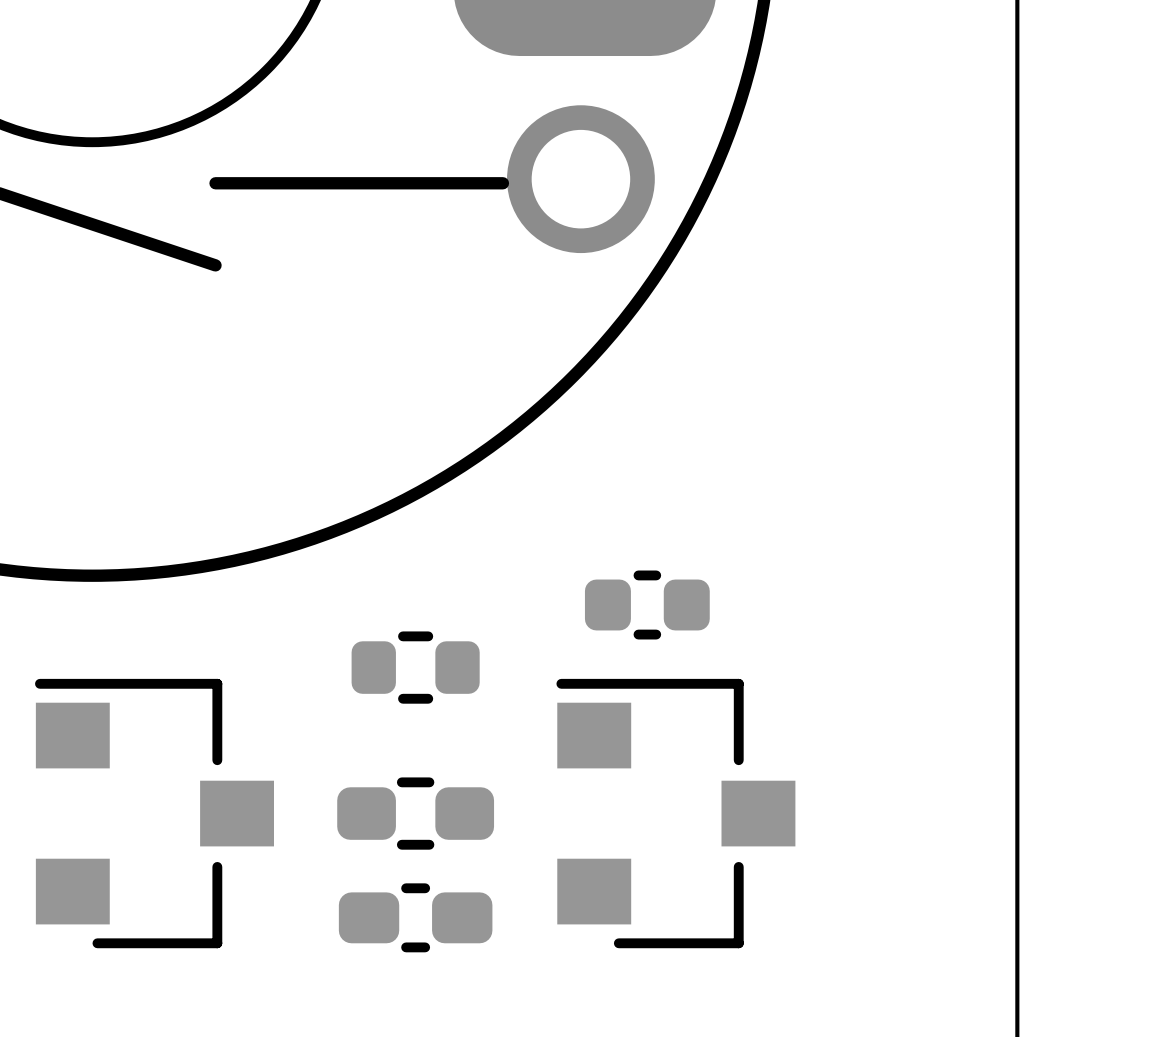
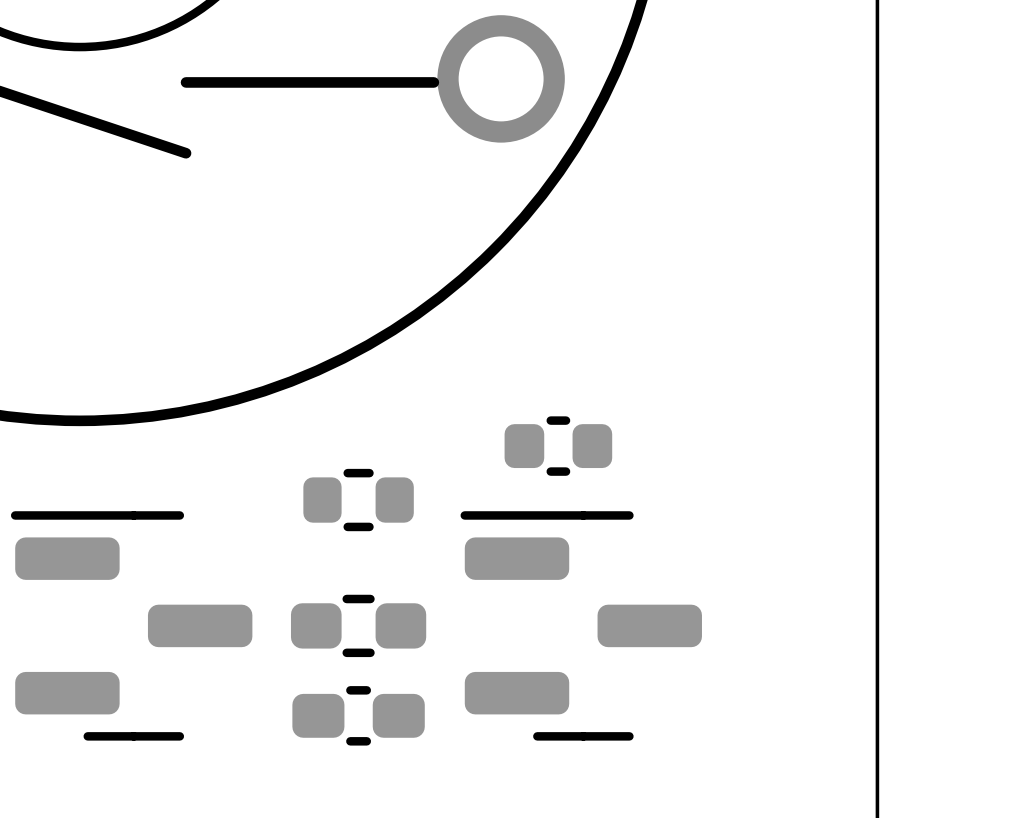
part footprint: [35, 678, 274, 949] -> [10, 511, 253, 741]
part footprint: [556, 678, 796, 949] -> [460, 511, 702, 741]

